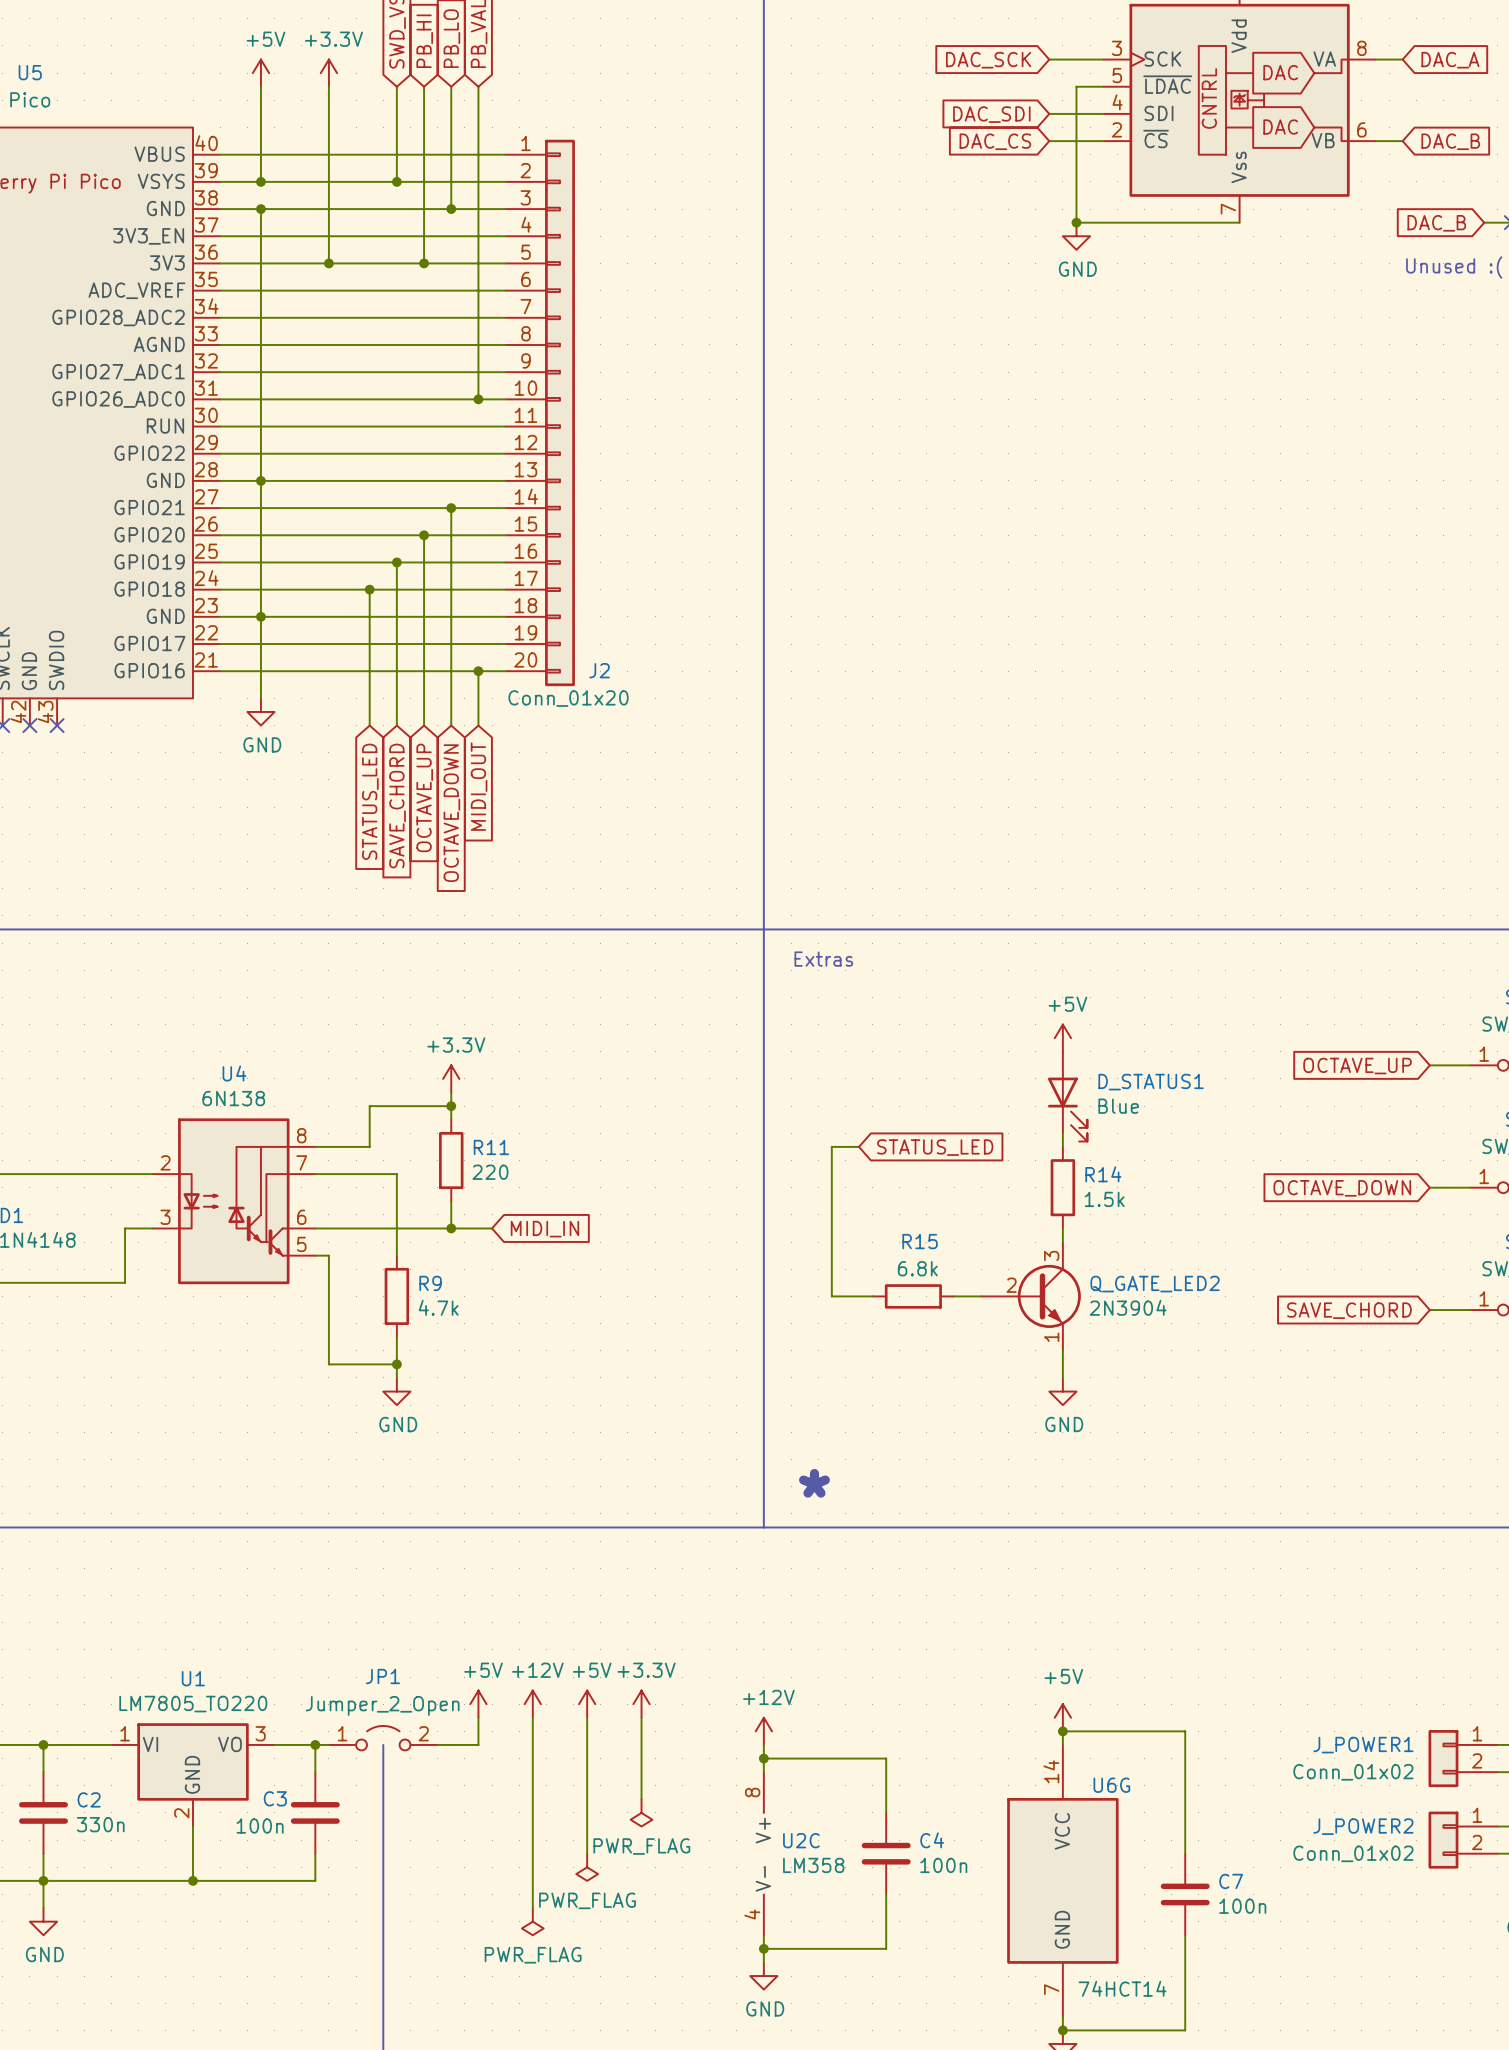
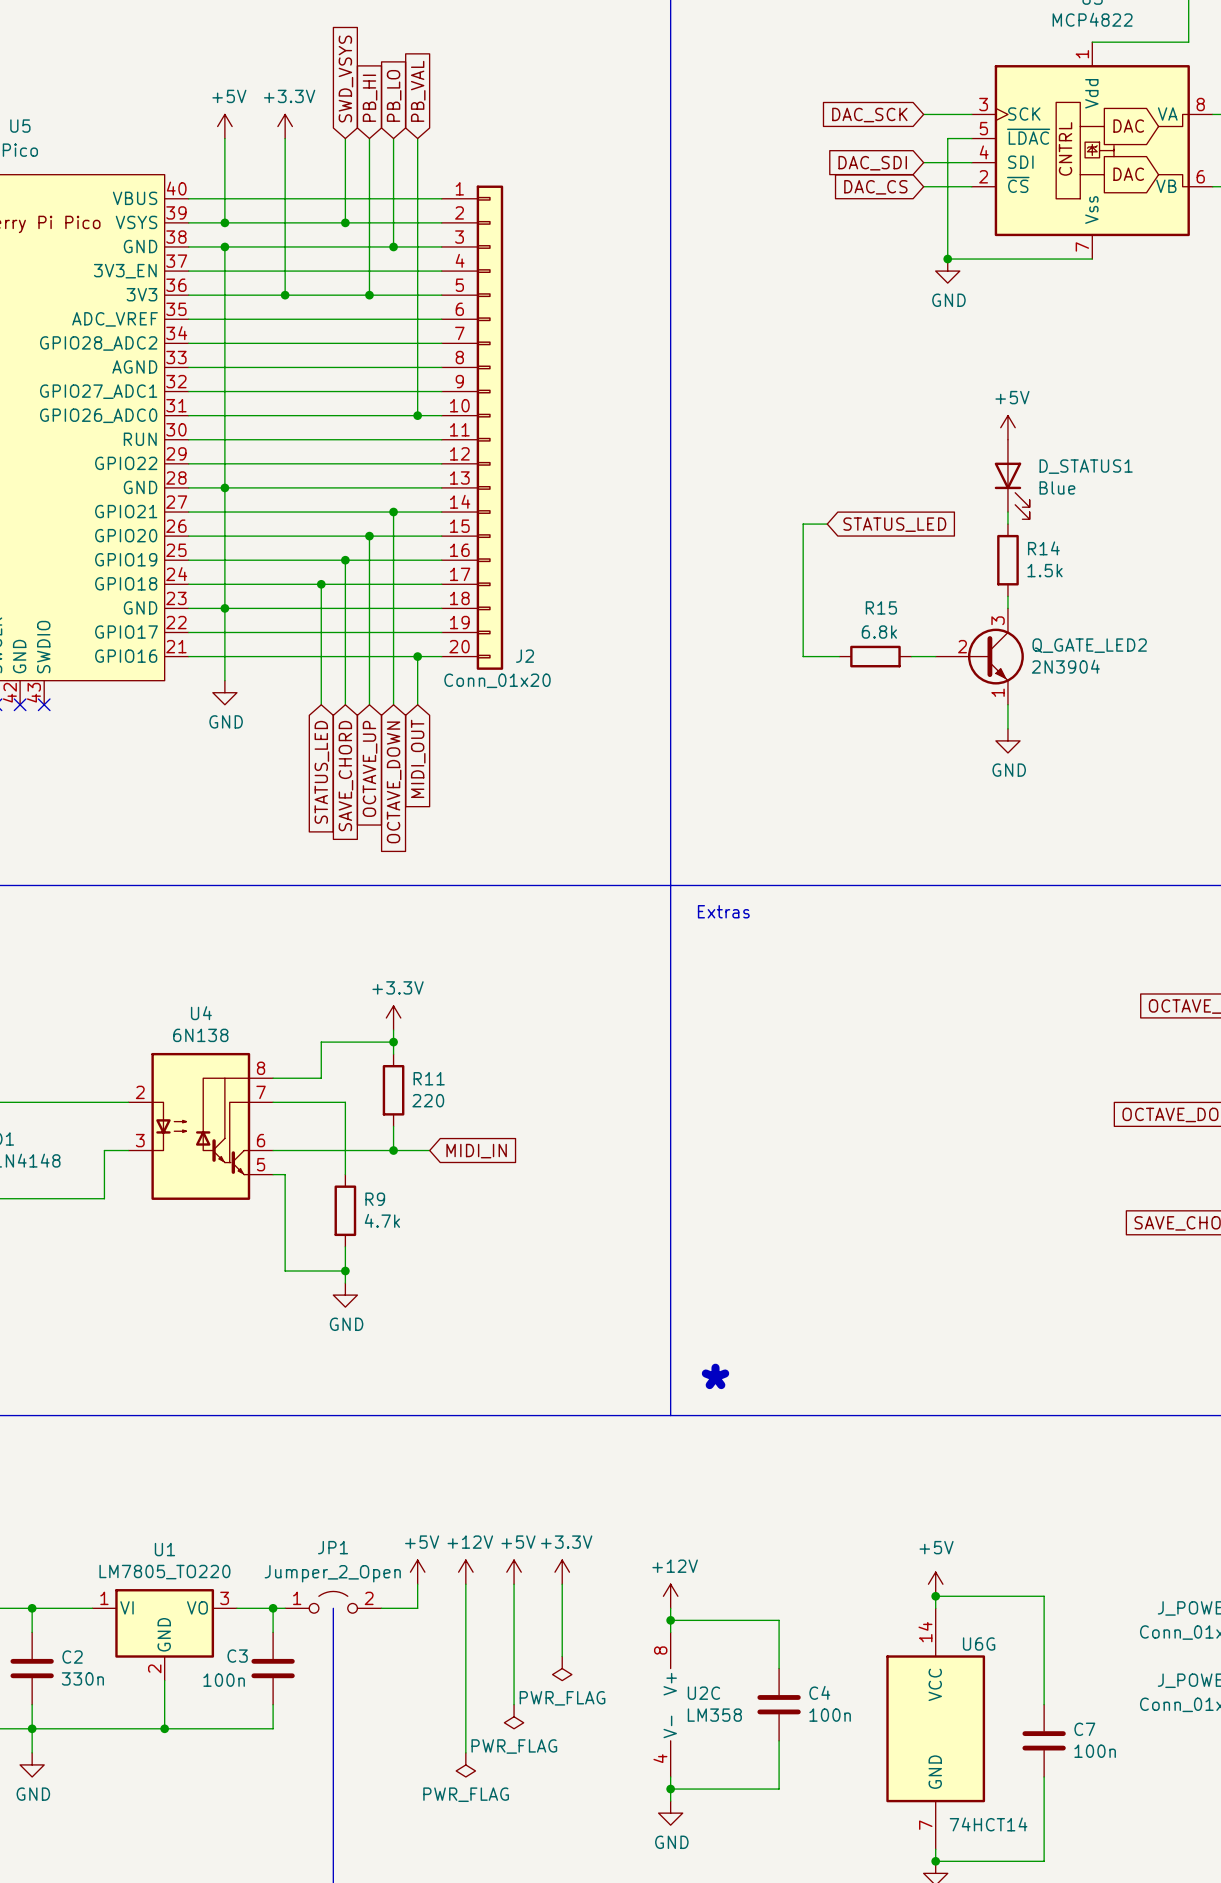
power symbol: none -> +5V (1007, 427)
wire: none -> (1007, 512) (1007, 524)
wire: none -> (827, 524) (803, 524) (803, 656) (839, 656)
global label: none -> STATUS_LED (894, 524)
wire: none -> (1007, 596) (1007, 608)
wire: none -> (911, 656) (935, 656)
wire: none -> (1007, 704) (1007, 728)
power symbol: none -> GND (1007, 740)
power symbol: +5V (1062, 1038) -> none
D_STATUS1 position: (1067, 1096) -> (1012, 479)
wire: (1062, 1133) (1062, 1146) -> none
wire: (859, 1146) (831, 1146) (831, 1296) (872, 1296) -> none
global label: STATUS_LED (935, 1147) -> none
R14 position: (1062, 1187) -> (1007, 560)
wire: (1062, 1228) (1062, 1242) -> none
R15 position: (913, 1296) -> (875, 656)
wire: (954, 1296) (981, 1296) -> none
Q_GATE_LED2 position: (1031, 1296) -> (979, 656)
wire: (1062, 1350) (1062, 1377) -> none
power symbol: GND (1062, 1391) -> none

